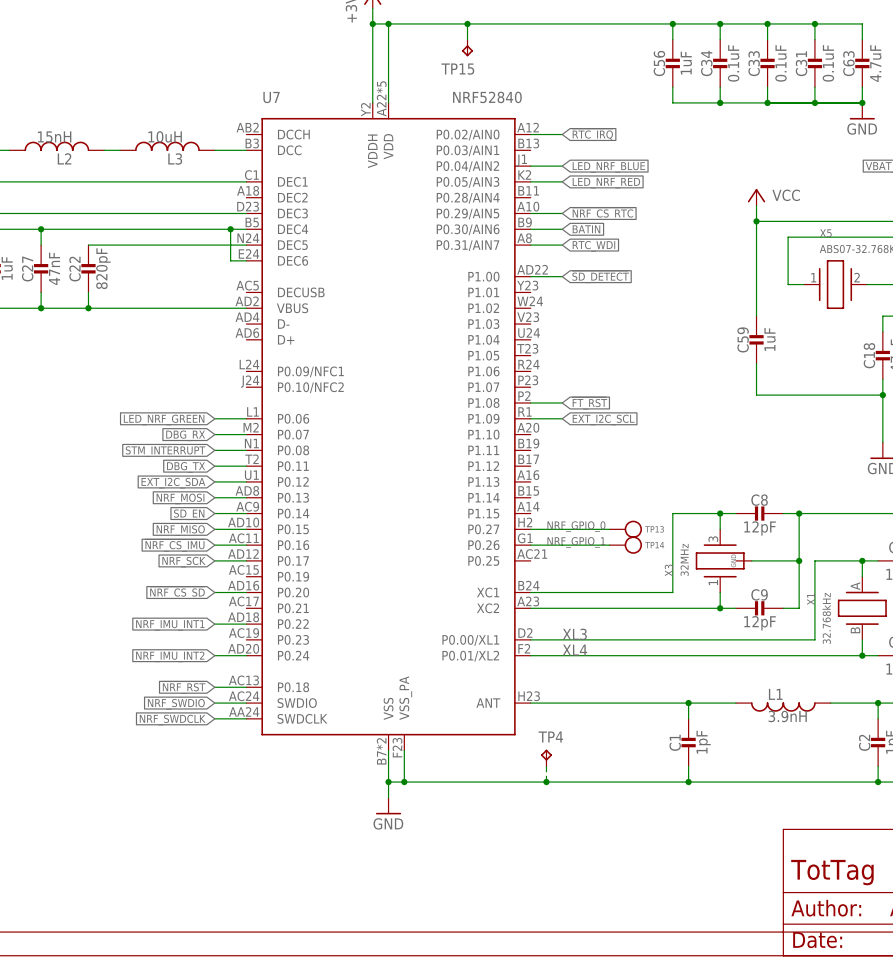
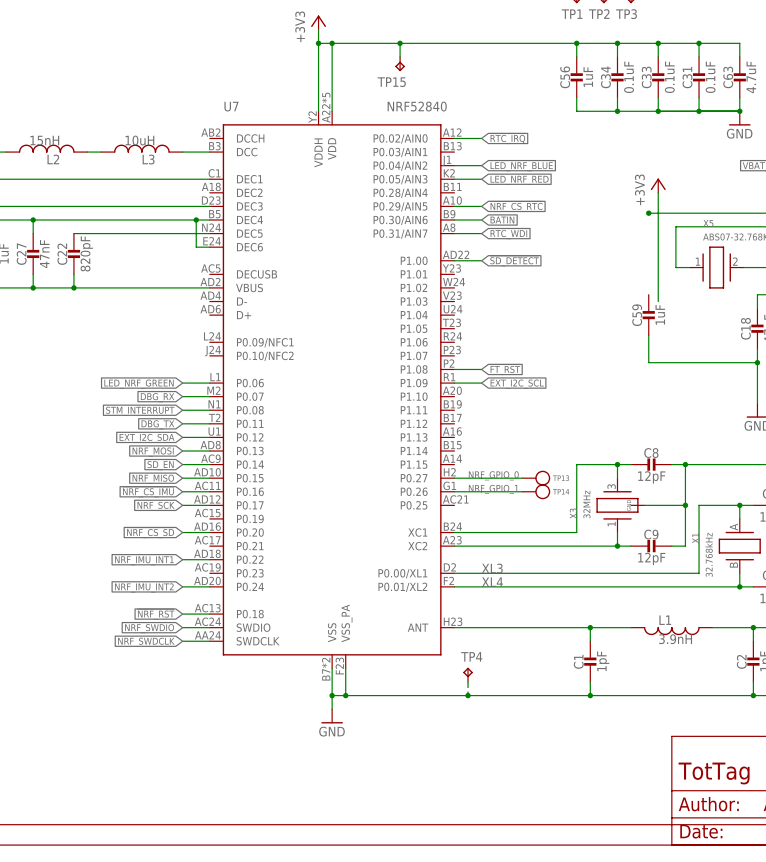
power symbol: none -> +3V3 (658, 185)
power symbol: VCC (756, 197) -> none
wire: none -> (658, 192) (658, 301)
wire: (756, 205) (756, 316) -> none

